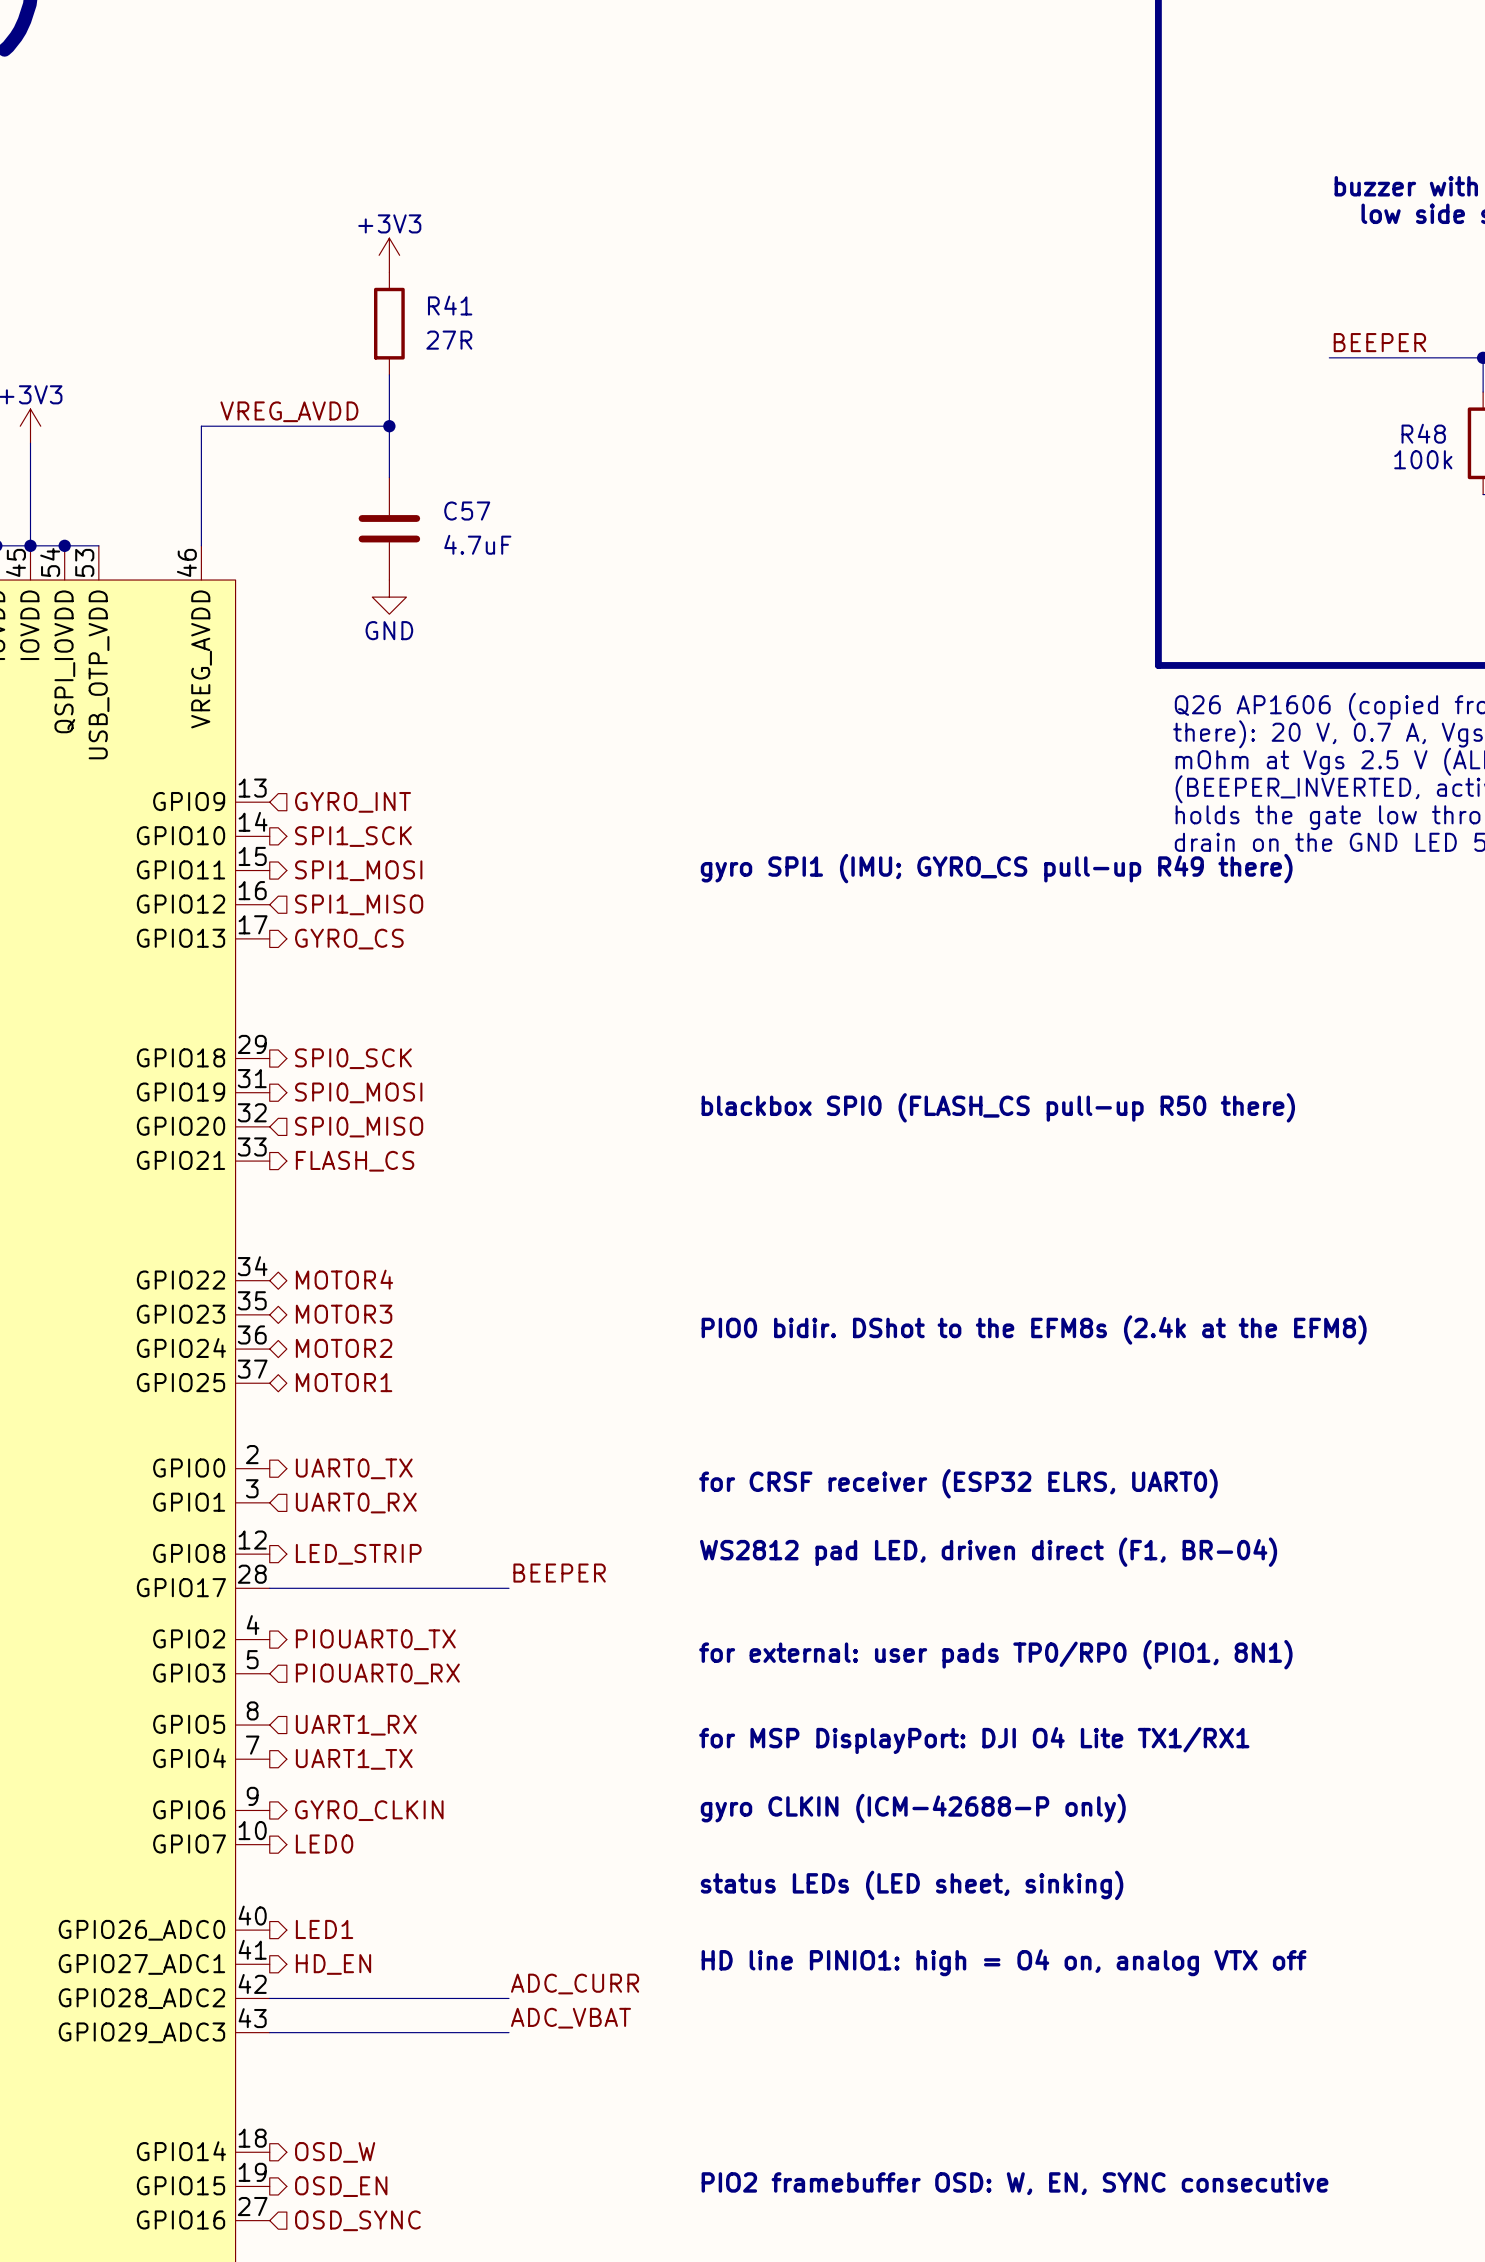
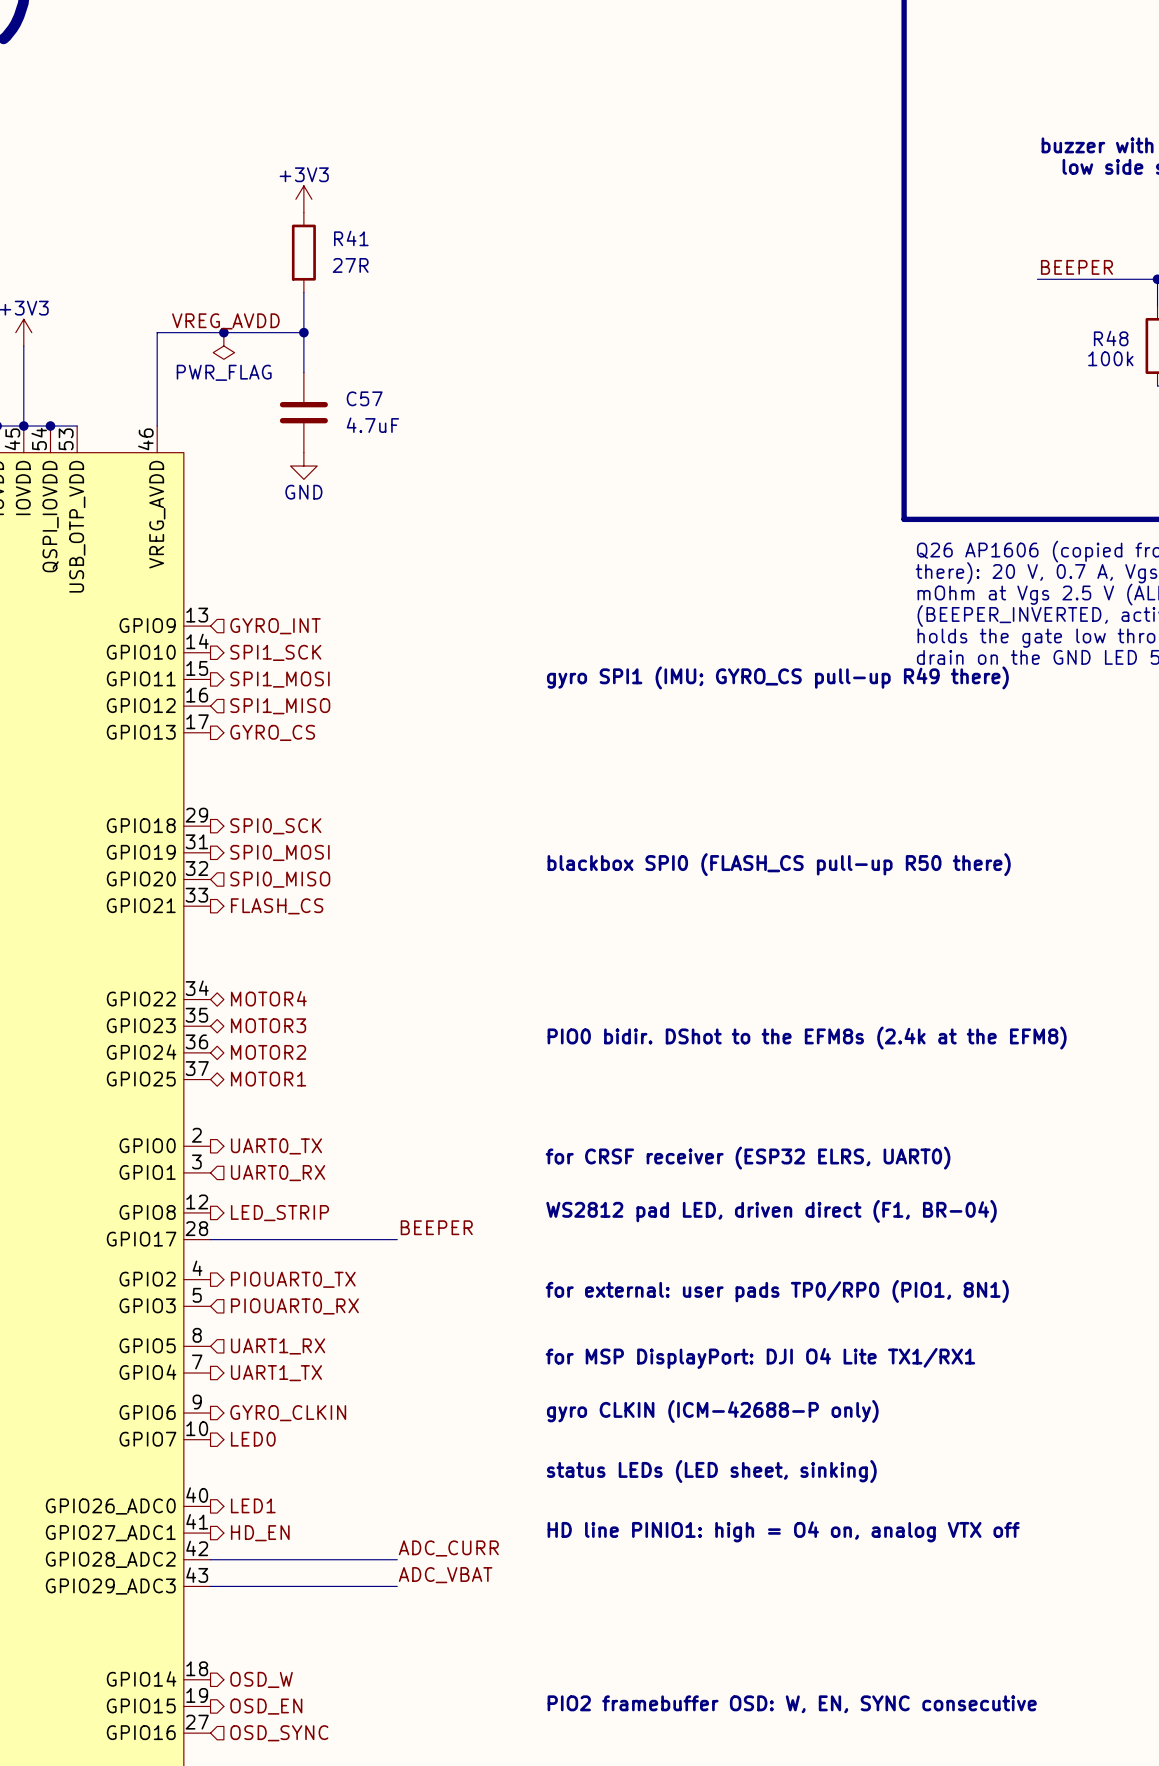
junction: none -> (223, 332)
power symbol: none -> PWR_FLAG (223, 345)

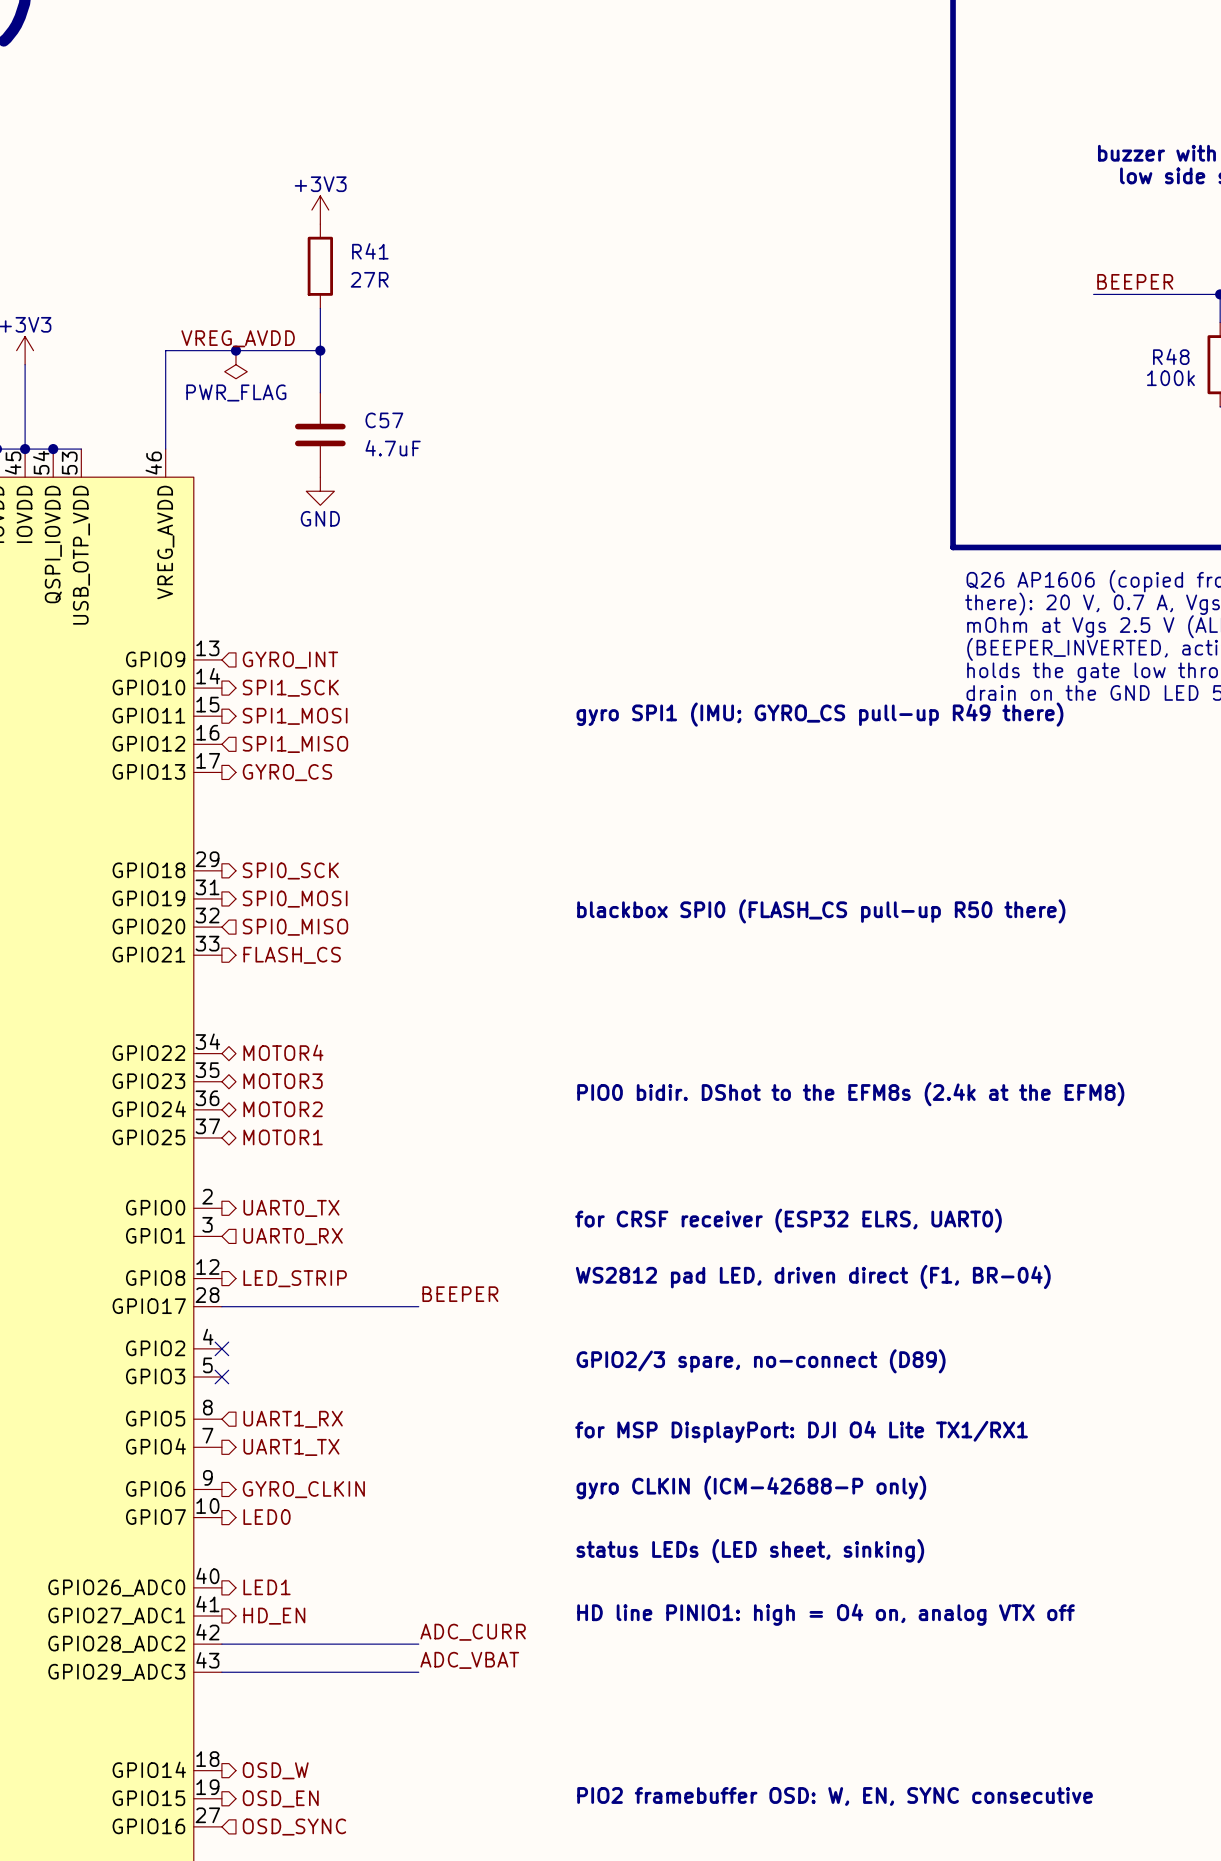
no-connect mark: none -> (221, 1348)
hierarchical label: PIOUART0_TX (293, 1279) -> none
text: for external: user pads TP0/RP0 (PIO1, 8N1) (777, 1291) -> GPIO2/3 spare, no-connect (D89) (761, 1361)
no-connect mark: none -> (221, 1376)
hierarchical label: PIOUART0_RX (294, 1306) -> none

